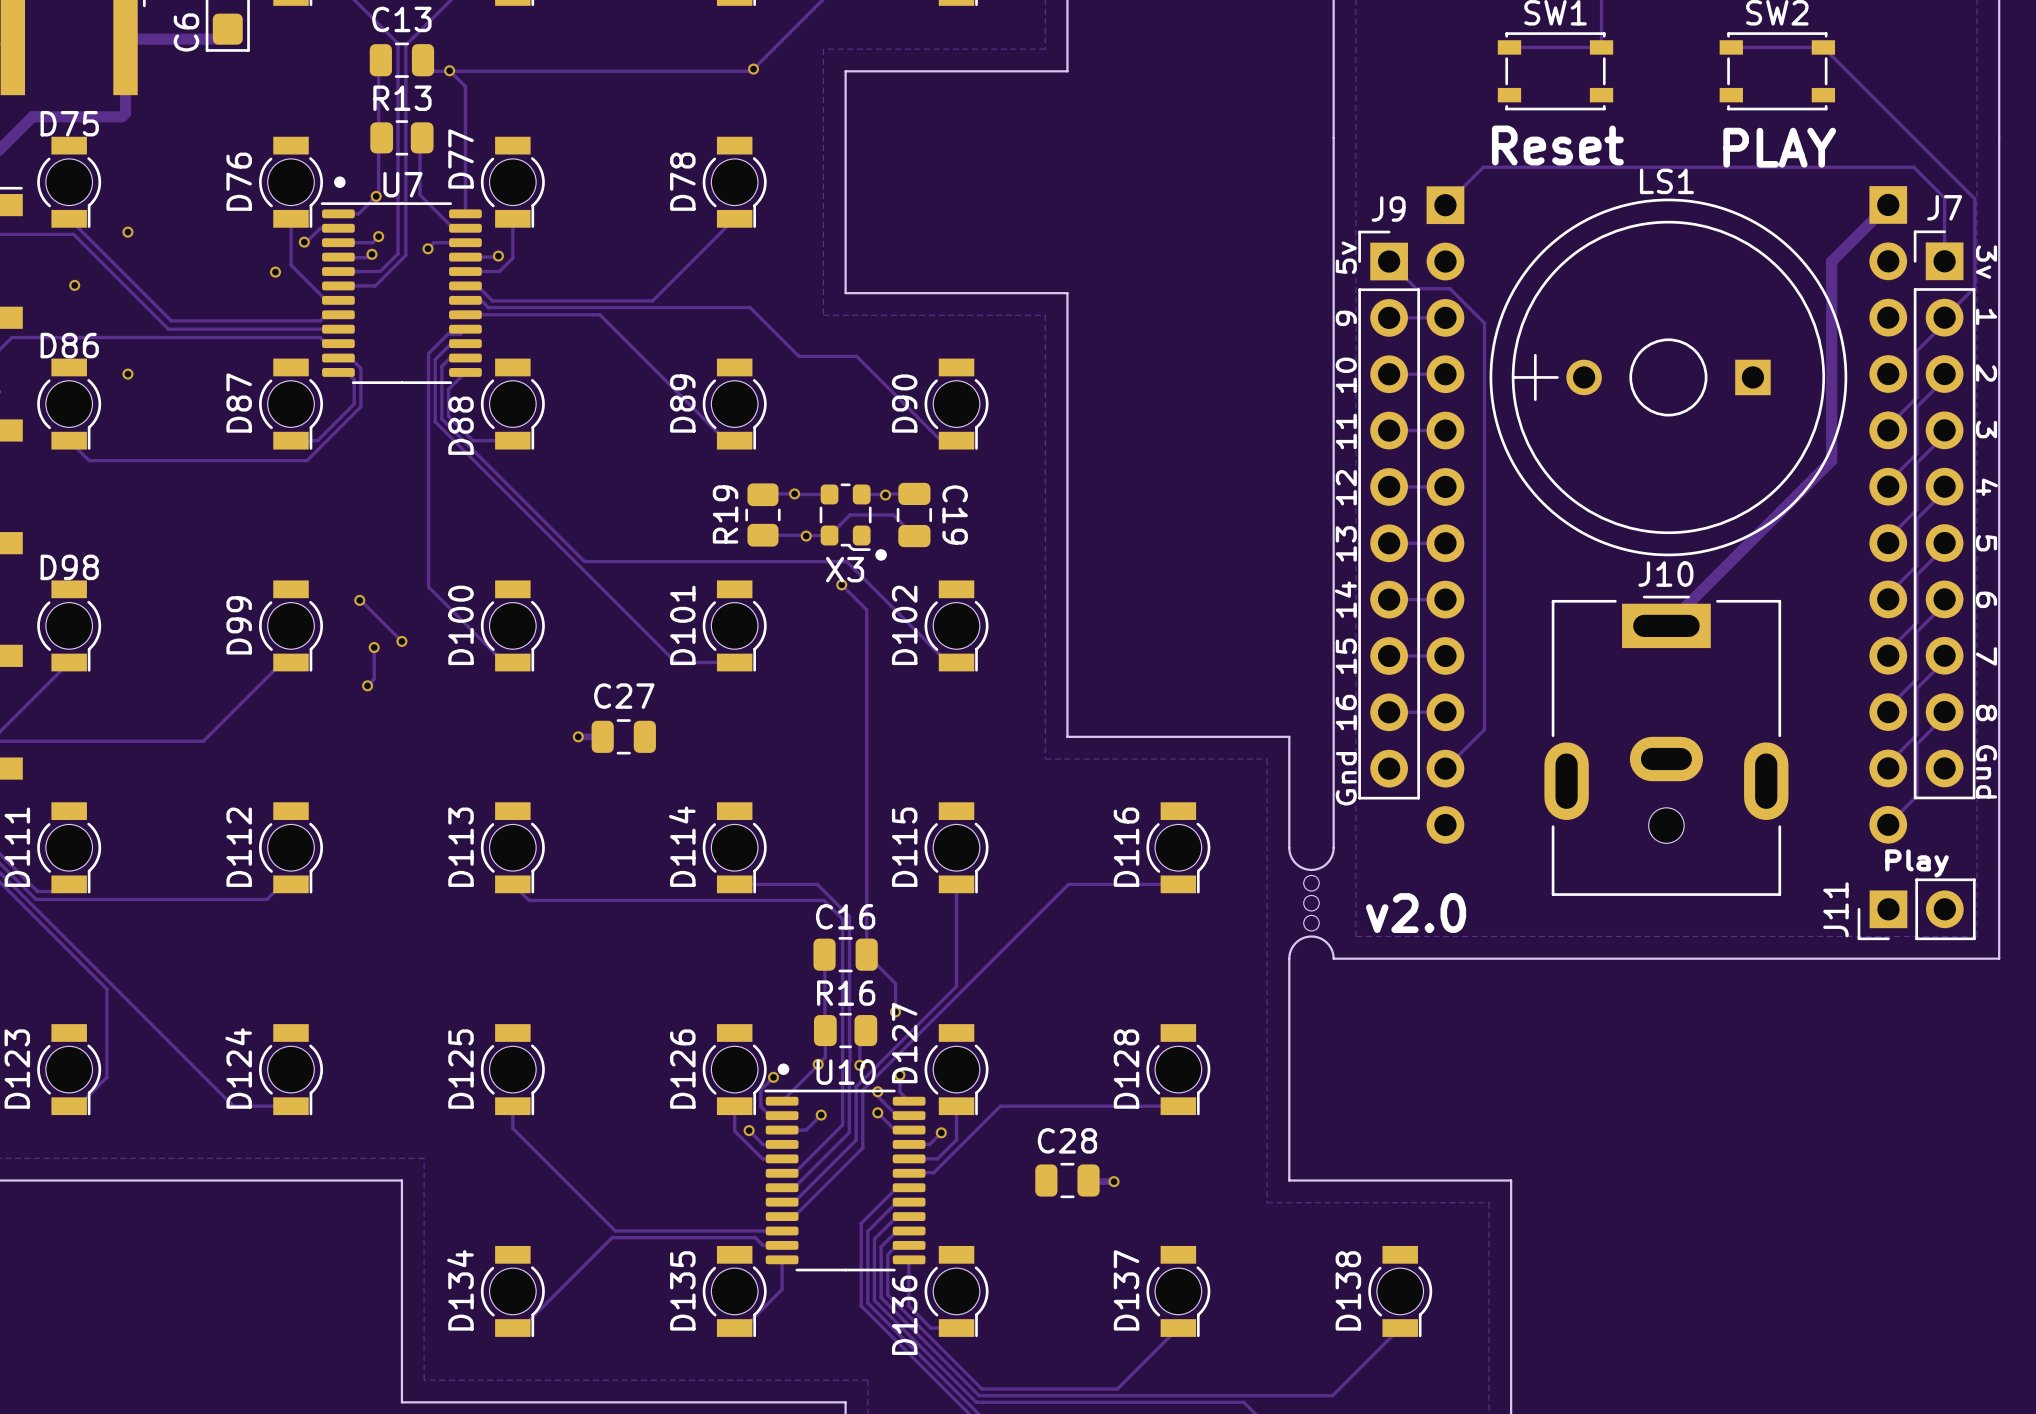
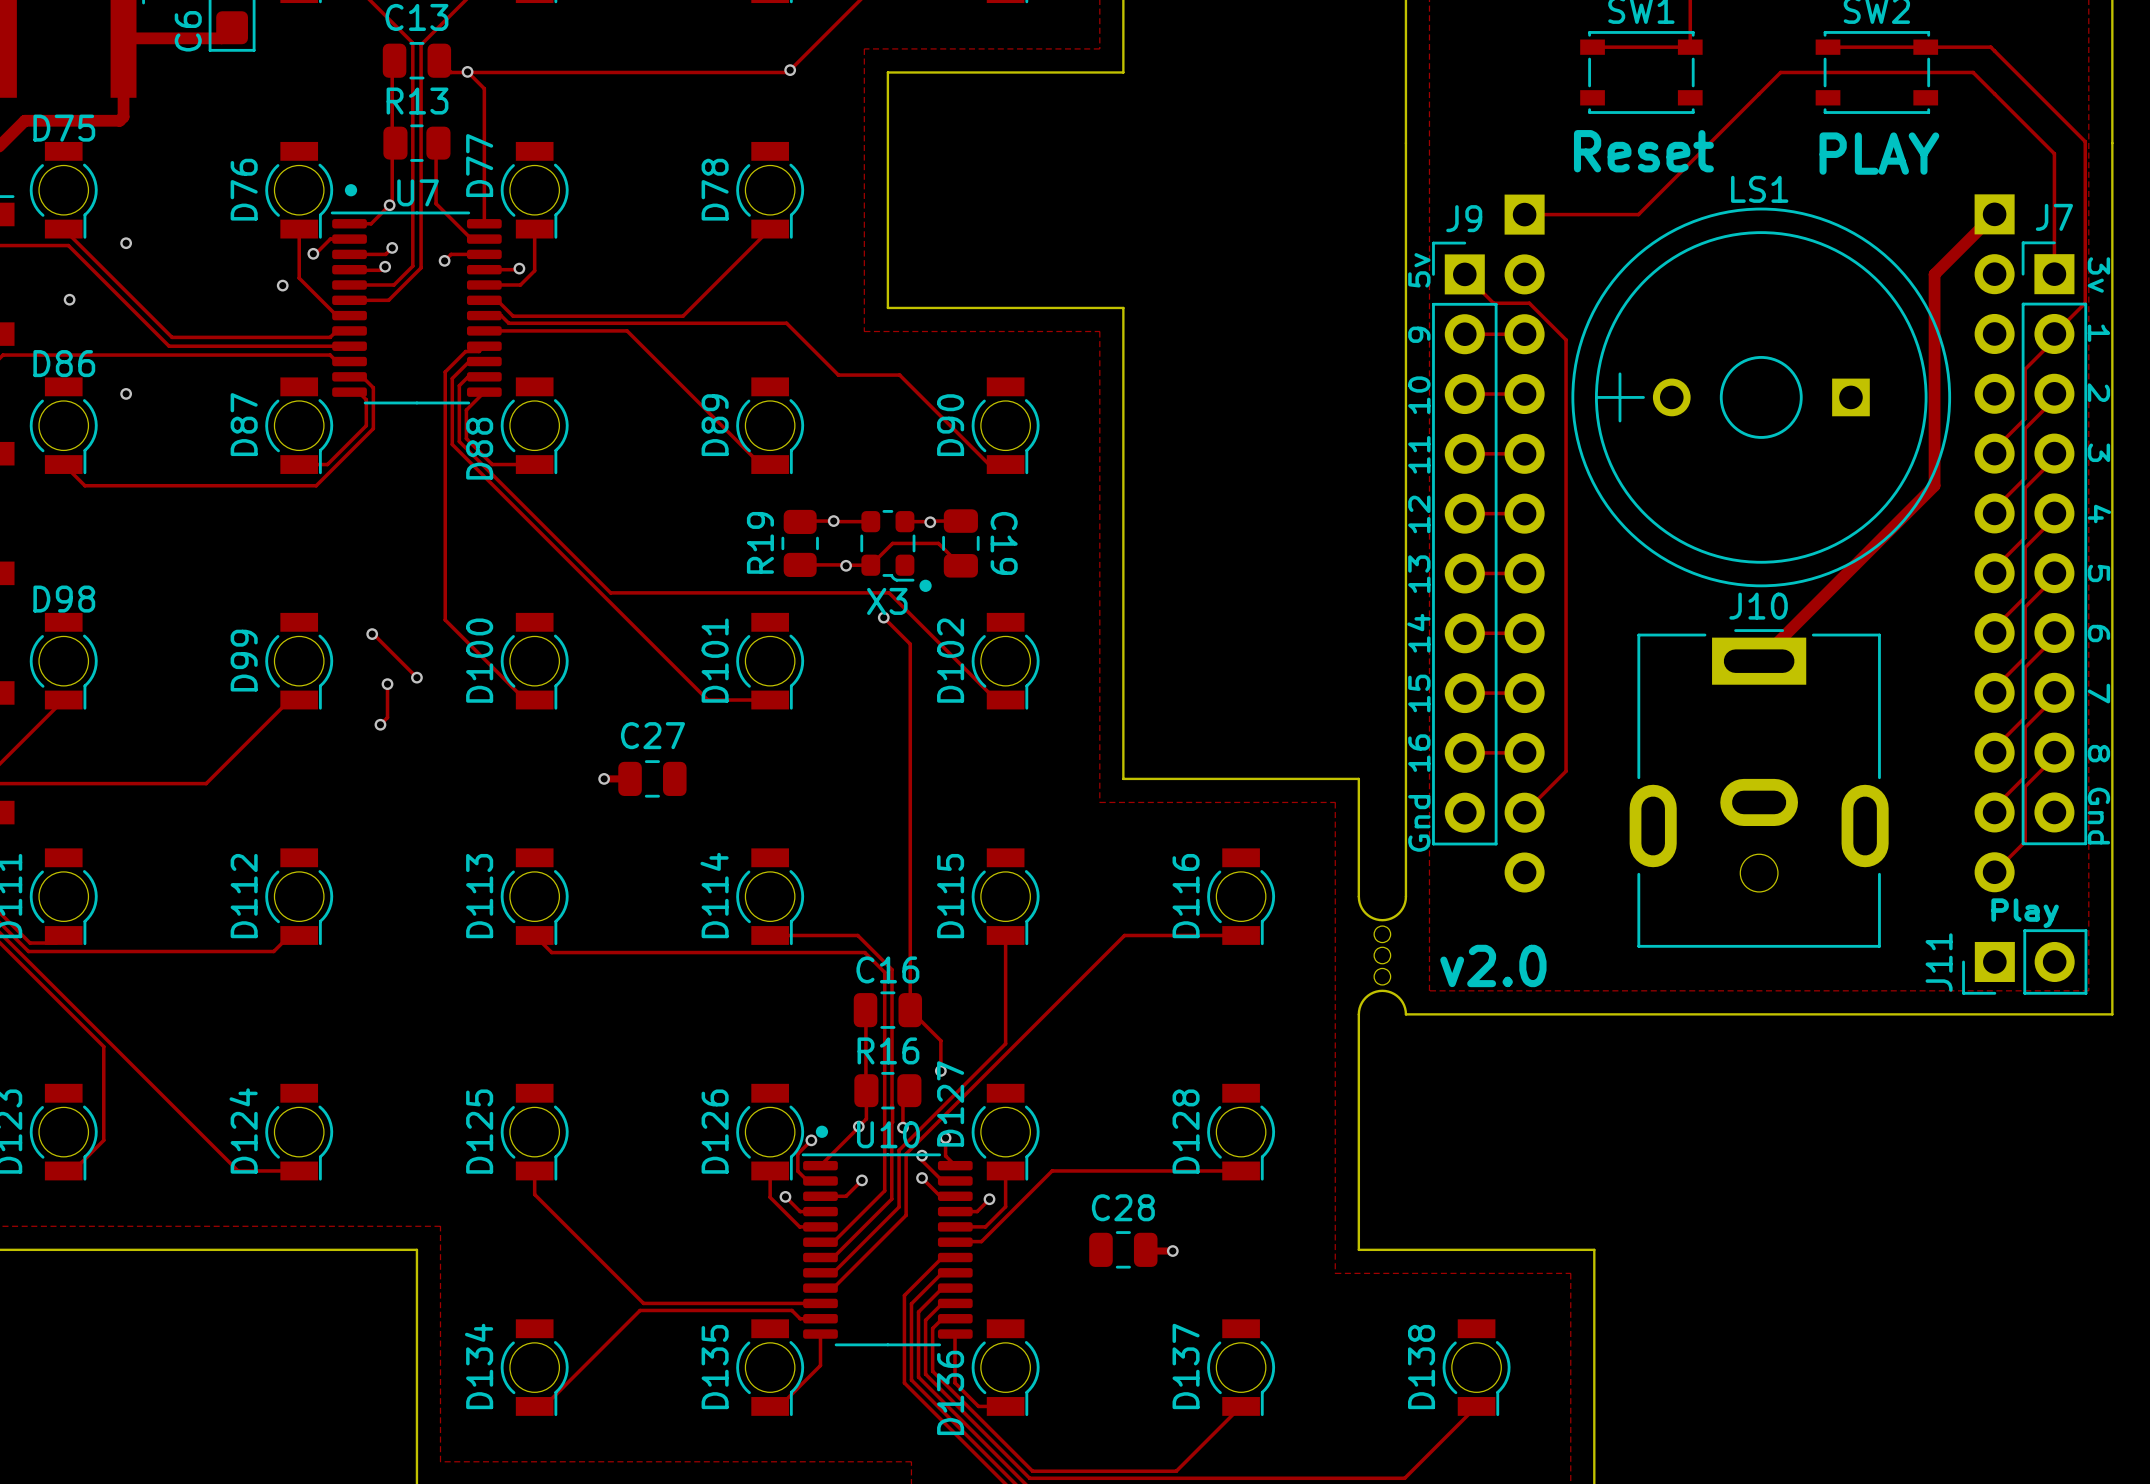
track: (1823, 47) (1974, 198) (1973, 288) -> (1925, 47) (1990, 47) (2085, 141) (2085, 303)
track: (1944, 198) (1913, 167) (1483, 167) (1445, 205) -> (2054, 207) (2054, 153) (1973, 72) (1780, 72) (1638, 214) (1524, 214)

